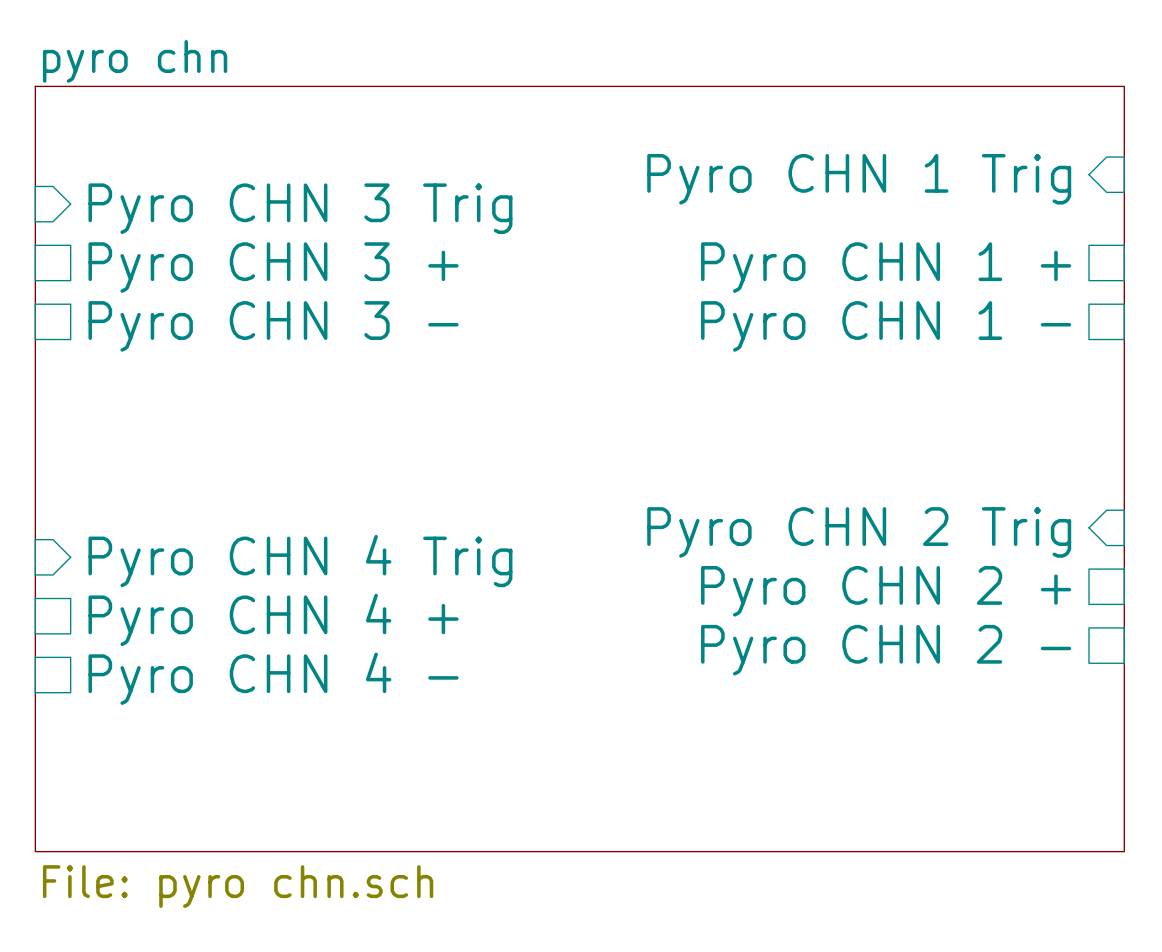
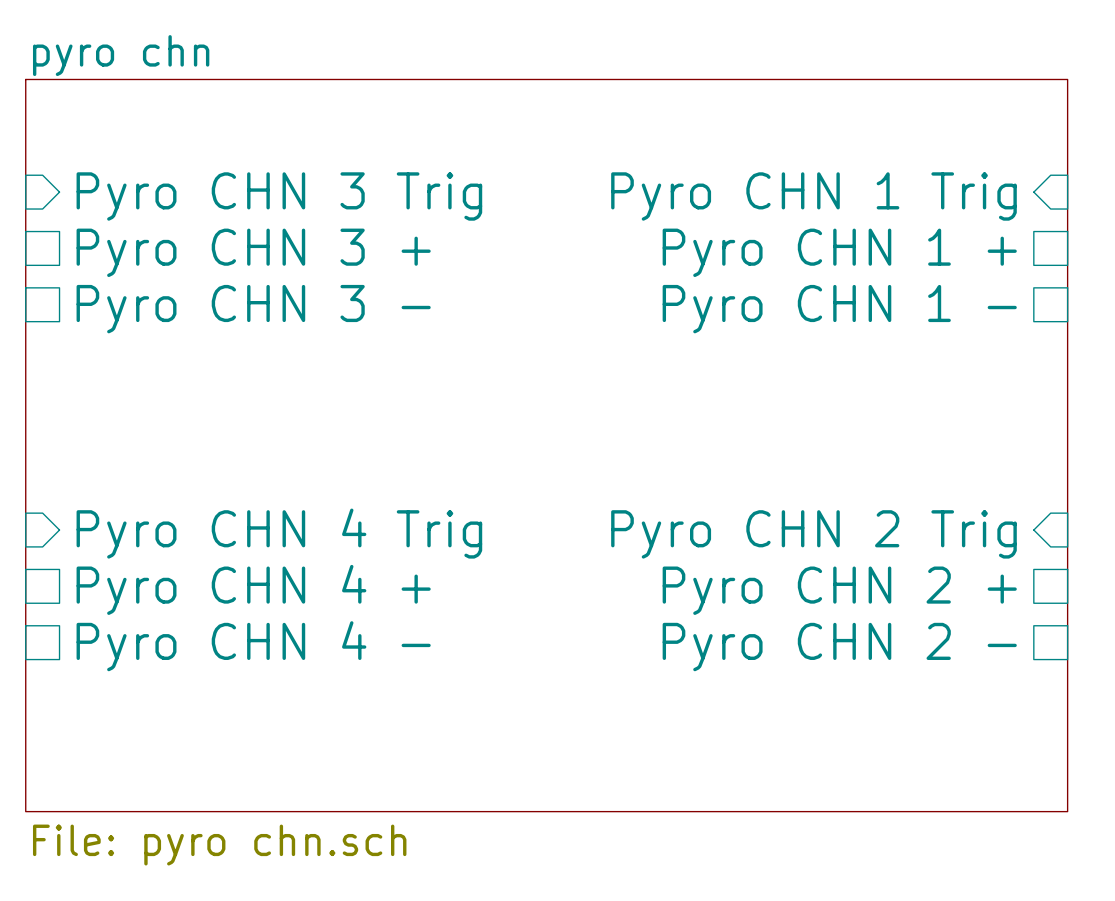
sheet pin position: Pyro CHN 1 Trig (859, 179) -> Pyro CHN 1 Trig (813, 196)
sheet pin position: Pyro CHN 2 Trig (859, 532) -> Pyro CHN 2 Trig (813, 534)
sheet pin position: Pyro CHN 2 + (886, 591) -> Pyro CHN 2 + (839, 590)
sheet pin position: Pyro CHN 2 - (886, 650) -> Pyro CHN 2 - (839, 647)

